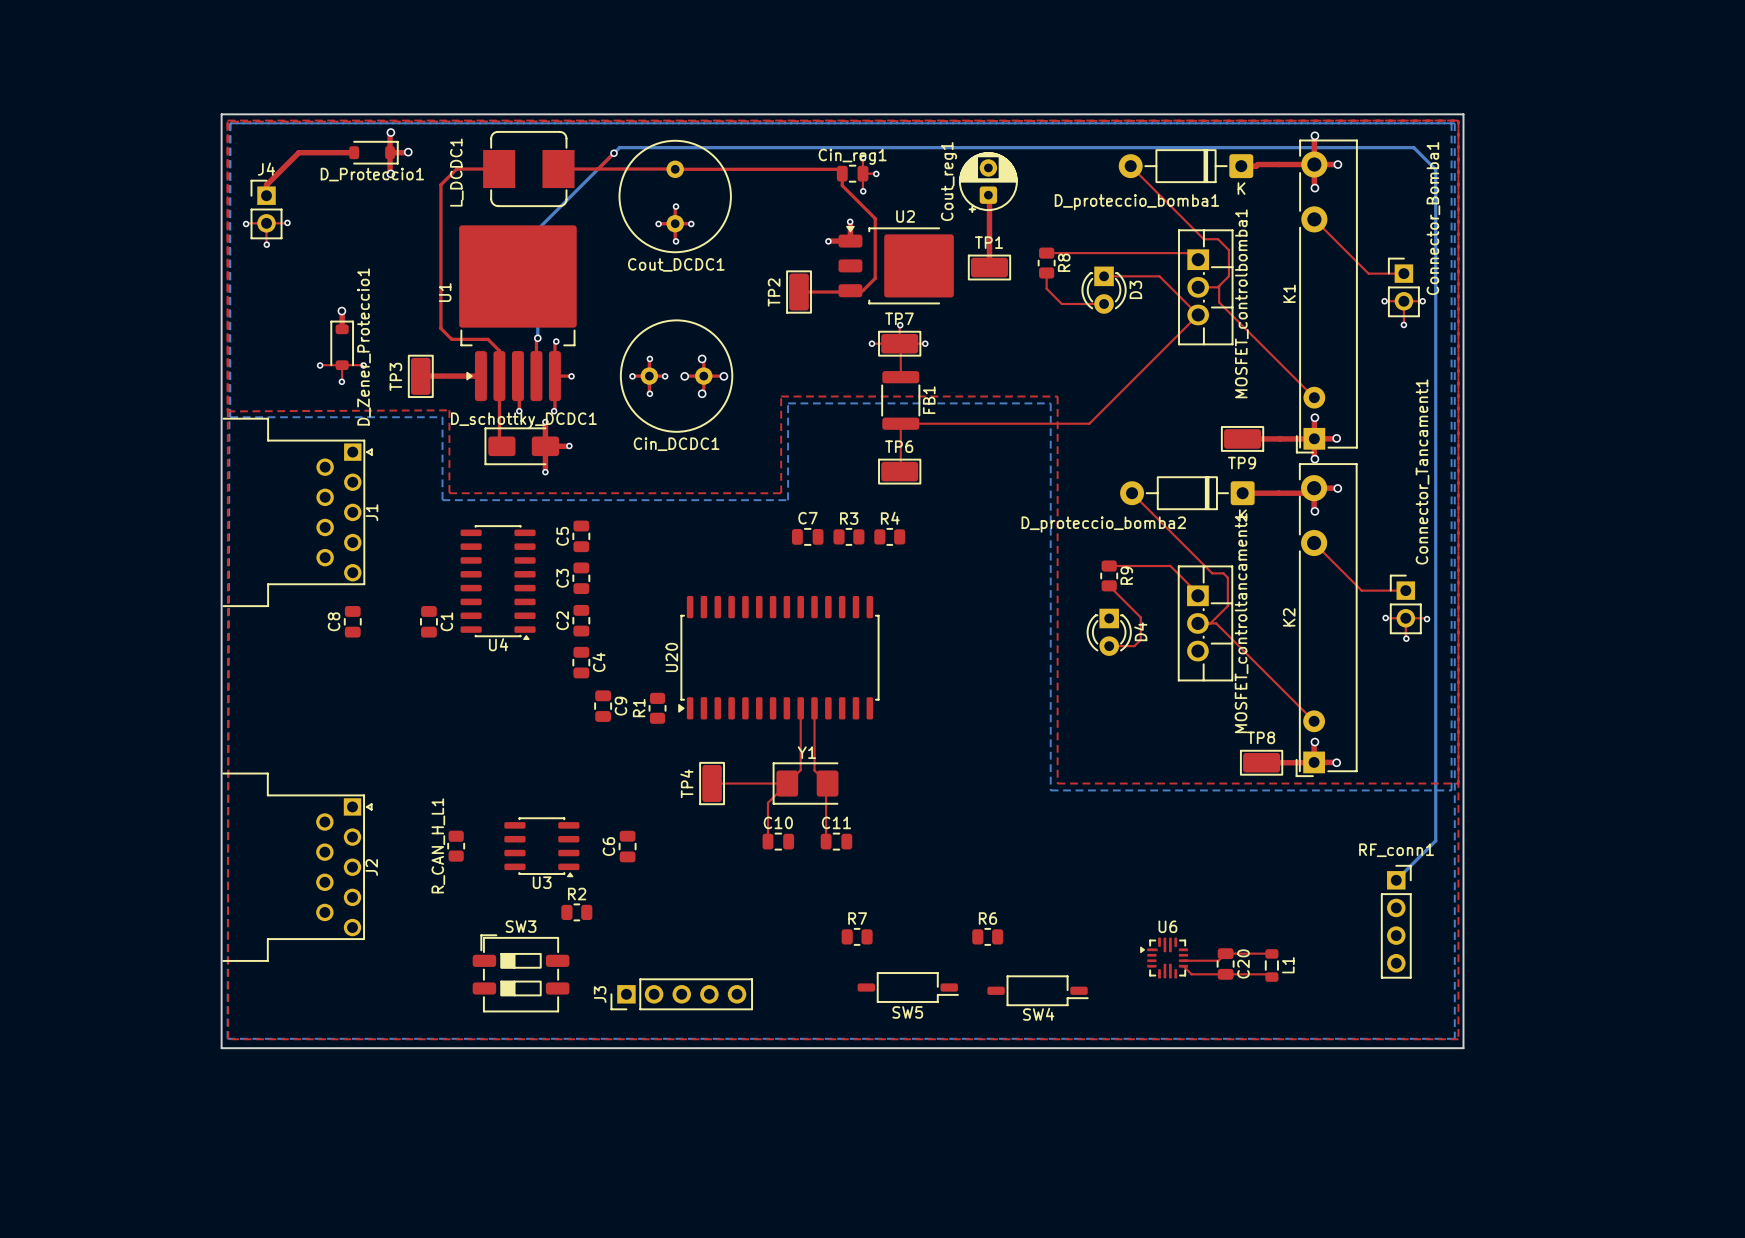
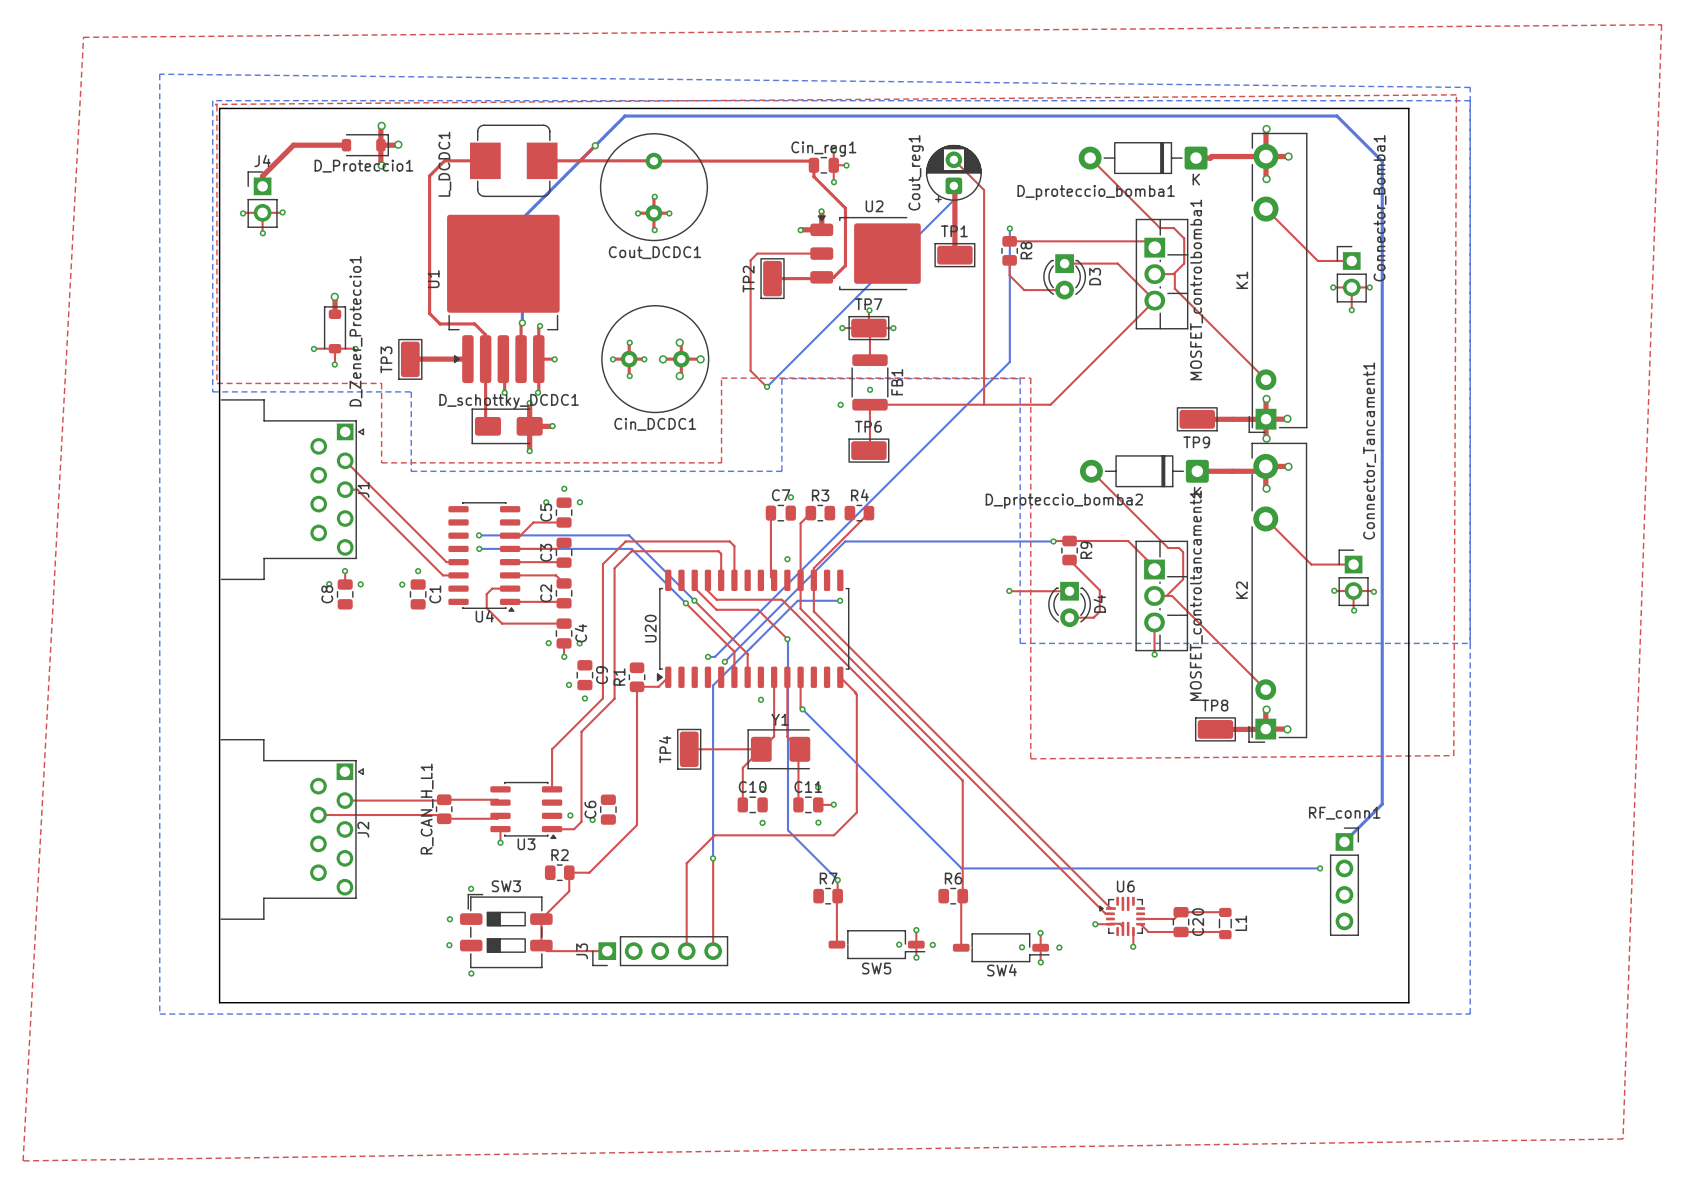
top zone outline: none -> (1661, 24) (83, 37) (23, 1160) (1623, 1139) (1661, 24)
bottom zone outline: none -> (1470, 100) (212, 100) (212, 391) (411, 391) (411, 471) (781, 471) (781, 378) (1020, 378) (1020, 643) (1470, 643)
top zone outline: (1458, 120) (227, 120) (228, 1039) (1458, 1039) (1458, 120) -> (1456, 94) (215, 104) (216, 105) (216, 383) (381, 383) (381, 462) (721, 462) (721, 378) (1030, 378) (1030, 758) (1453, 755) (1456, 94)
top zone outline: (1458, 120) (227, 121) (227, 411) (449, 410) (449, 493) (781, 493) (781, 396) (1057, 396) (1057, 783) (1458, 783) -> none
bottom zone outline: (230, 123) (1454, 123) (1454, 1038) (227, 1038) (230, 123) -> (159, 74) (159, 1014) (1470, 1014) (1470, 87) (159, 74)
bottom zone outline: (230, 123) (230, 417) (442, 417) (442, 500) (788, 500) (788, 403) (1050, 403) (1050, 790) (1451, 790) (1451, 123) -> none
bottom track: (619, 147) (1413, 147) -> (600, 140) (625, 116) (1336, 116) (1361, 140)
top track: none -> (953, 159) (984, 190) (984, 404)
bottom track: none -> (953, 185) (953, 200) (767, 386)
bottom track: none -> (1009, 228) (1009, 361) (714, 656) (708, 656)
via: none -> (1009, 228)
top track: none -> (821, 253) (757, 253) (750, 260) (750, 370) (767, 386)
via: none -> (767, 386)
via: none -> (870, 389)
via: none -> (840, 404)
top track: none -> (345, 460) (446, 562) (458, 562)
via: none -> (564, 488)
top track: none -> (345, 489) (357, 489) (443, 575) (458, 575)
via: none -> (790, 497)
via: none -> (546, 502)
via: none -> (579, 502)
top track: none -> (770, 513) (770, 577) (774, 580)
top track: none -> (810, 513) (800, 523) (800, 608) (1105, 913) (1110, 913)
top track: none -> (868, 513) (813, 568) (813, 611) (1110, 908)
top track: none -> (564, 522) (533, 522) (520, 535) (510, 535)
bottom track: none -> (479, 535) (629, 535) (694, 600)
via: none -> (479, 535)
bottom track: none -> (1053, 541) (845, 541) (724, 661)
via: none -> (1053, 541)
top track: none -> (1069, 541) (1053, 541)
top track: none -> (564, 542) (557, 548) (510, 548)
bottom track: none -> (479, 548) (631, 548) (685, 603)
via: none -> (479, 548)
via: none -> (787, 559)
top track: none -> (510, 562) (564, 562)
top track: none -> (345, 571) (345, 584)
via: none -> (345, 571)
via: none -> (418, 571)
top track: none -> (510, 575) (555, 575) (564, 583)
top track: none -> (694, 580) (694, 587) (716, 609) (758, 609) (787, 639)
top track: none -> (707, 580) (707, 591) (716, 599) (781, 599) (962, 780) (961, 947)
top track: none -> (721, 580) (721, 553) (718, 551) (631, 551) (614, 568) (614, 698) (581, 731) (581, 821) (574, 829) (552, 829)
top track: none -> (734, 580) (734, 546) (729, 541) (625, 541) (602, 564) (602, 698) (552, 749) (552, 789)
via: none -> (329, 584)
via: none -> (360, 584)
via: none -> (402, 584)
top track: none -> (510, 588) (492, 588) (486, 594) (486, 608) (502, 623) (564, 623)
top track: none -> (1009, 590) (1069, 591)
via: none -> (1009, 590)
top track: none -> (694, 600) (747, 653) (747, 677)
via: none -> (694, 600)
bottom track: none -> (840, 600) (797, 600) (713, 685) (713, 858)
via: none -> (840, 600)
top track: none -> (510, 601) (564, 603)
top track: none -> (685, 603) (734, 651) (734, 677)
via: none -> (685, 603)
top track: none -> (1154, 622) (1154, 654)
bottom track: none -> (787, 639) (787, 830) (837, 880)
via: none -> (787, 639)
via: none -> (548, 643)
top track: none -> (564, 643) (564, 656)
via: none -> (579, 643)
via: none -> (1154, 654)
via: none -> (564, 656)
via: none -> (708, 656)
via: none -> (724, 661)
top track: none -> (668, 677) (658, 686) (637, 686) (637, 825) (589, 872) (569, 872) (569, 891) (541, 919) (541, 945) (546, 951) (607, 951)
top track: none -> (800, 677) (800, 707) (802, 709)
top track: none -> (840, 677) (856, 694) (856, 812) (834, 835) (714, 835) (686, 863) (686, 951)
via: none -> (569, 684)
via: none -> (584, 698)
via: none -> (760, 699)
bottom track: none -> (802, 709) (961, 868) (1320, 868)
via: none -> (802, 709)
via: none -> (818, 787)
via: none -> (762, 789)
top track: none -> (345, 799) (497, 799) (500, 802)
top track: none -> (833, 804) (818, 804)
via: none -> (833, 804)
top track: none -> (318, 815) (440, 815) (444, 818) (497, 818) (500, 815)
via: none -> (570, 815)
via: none -> (592, 819)
via: none -> (762, 822)
via: none -> (818, 822)
top track: none -> (500, 829) (500, 842)
via: none -> (500, 842)
via: none -> (713, 858)
top track: none -> (713, 858) (713, 951)
via: none -> (1320, 868)
top track: none -> (837, 880) (836, 944)
via: none -> (837, 880)
via: none -> (471, 888)
via: none -> (449, 919)
top track: none -> (1095, 924) (1120, 923) (1122, 928)
via: none -> (1095, 924)
top track: none -> (916, 930) (916, 957)
via: none -> (916, 930)
top track: none -> (1133, 931) (1133, 946)
via: none -> (1040, 933)
top track: none -> (1040, 933) (1040, 962)
via: none -> (899, 944)
via: none -> (932, 944)
via: none -> (449, 945)
via: none -> (1133, 946)
via: none -> (1022, 947)
via: none -> (1059, 947)
via: none -> (916, 957)
via: none -> (1040, 962)
via: none -> (471, 973)

